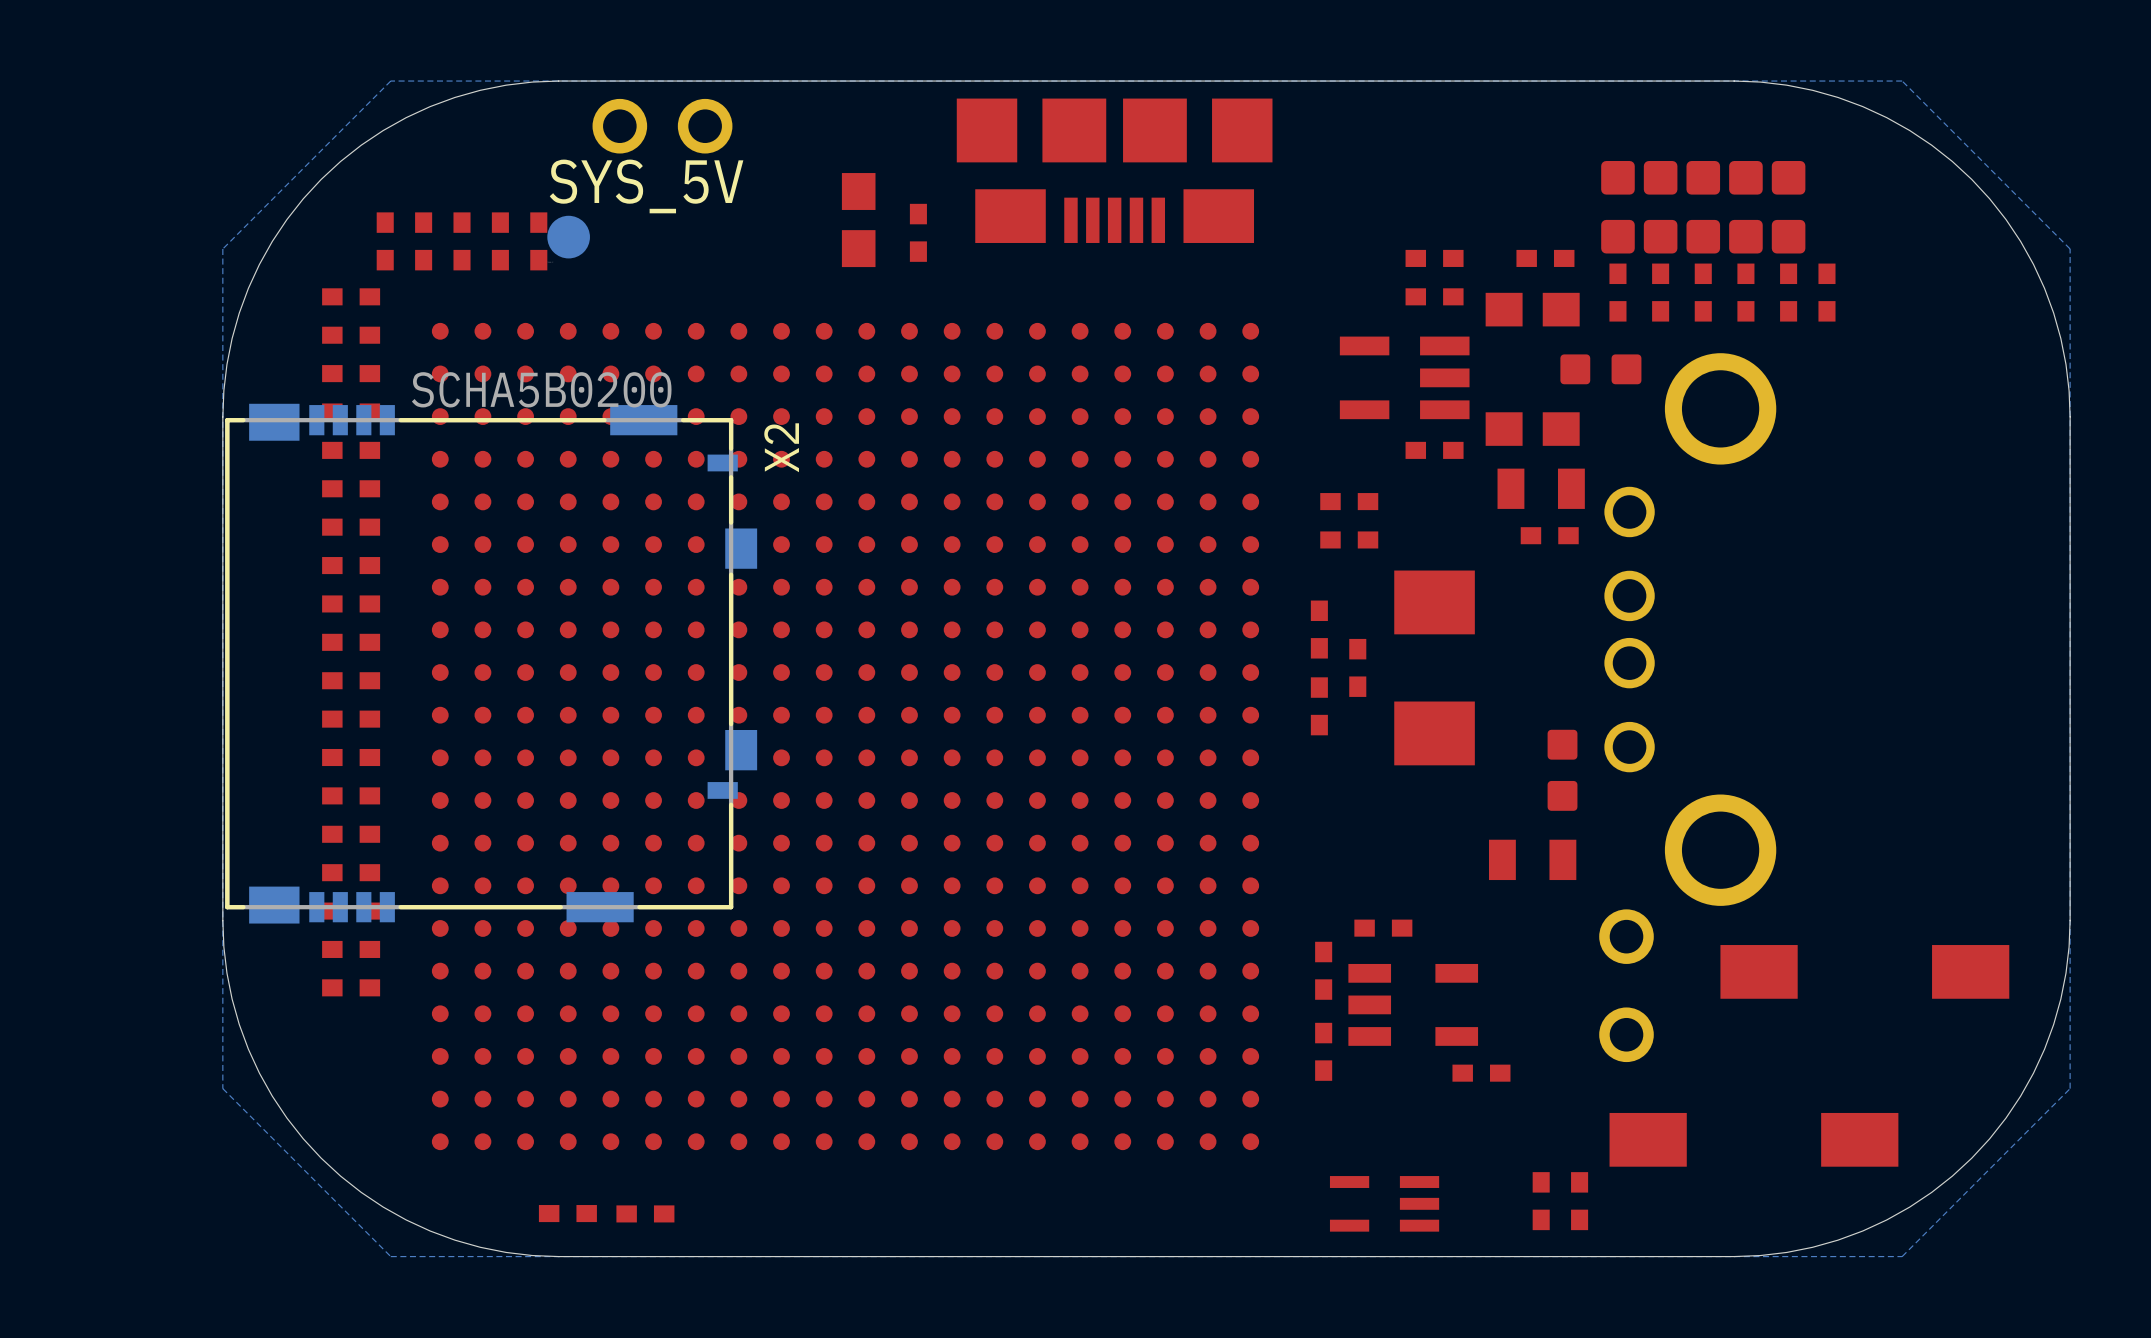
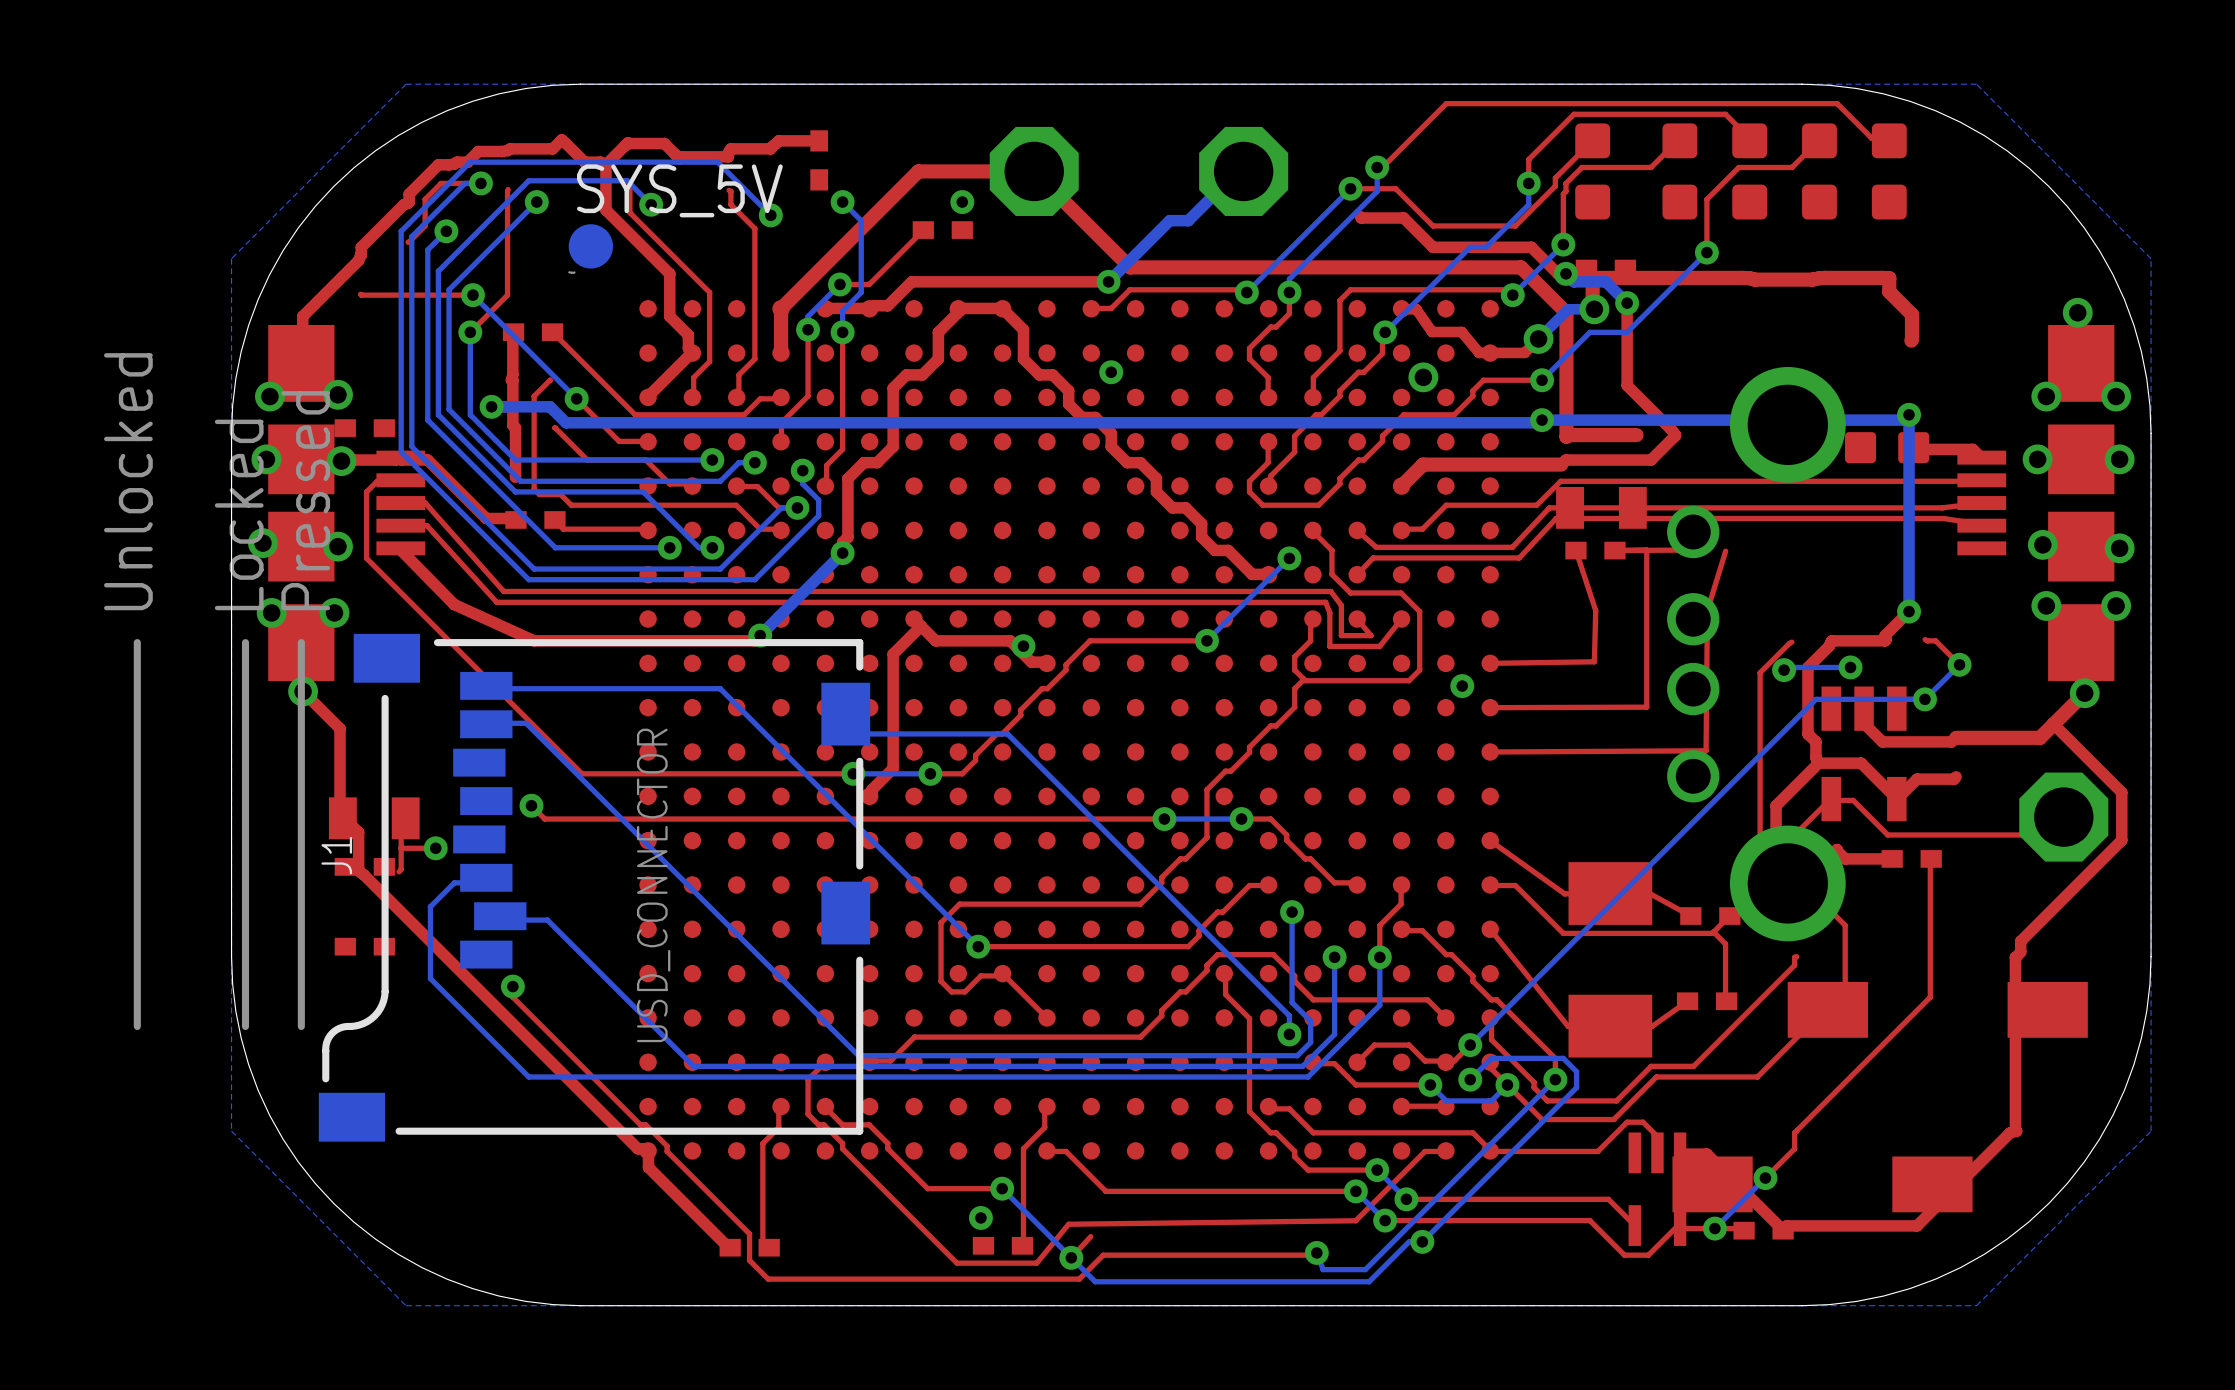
part: (619, 126) -> none
part: (705, 126) -> none
top track: none -> (818, 140) (778, 140) (770, 148) (730, 148) (728, 156) (680, 156) (679, 158) (664, 143) (627, 142) (605, 164)
top track: none -> (1592, 140) (1555, 178) (1555, 186) (1515, 225) (1433, 225) (1395, 188) (1350, 188)
top track: none -> (1679, 140) (1651, 167) (1581, 167) (1565, 183) (1565, 191) (1563, 194) (1563, 244)
top track: none -> (1749, 140) (1749, 138) (1725, 114) (1573, 114) (1528, 159) (1528, 183)
top track: none -> (1819, 140) (1792, 167) (1738, 167) (1706, 199) (1706, 252)
top track: none -> (1889, 140) (1887, 138) (1871, 138) (1837, 103) (1446, 103) (1382, 167) (1377, 167)
part: none -> (819, 160)
top track: none -> (605, 164) (605, 210) (669, 273) (669, 316) (688, 335) (688, 348) (692, 353) (648, 397)
top track: none -> (605, 164) (600, 162) (584, 162) (561, 139) (552, 148) (510, 148) (502, 151) (478, 151) (467, 162) (438, 164) (409, 194) (408, 203) (403, 204) (361, 247) (361, 255)
bottom track: none -> (1377, 167) (1377, 191) (1289, 279) (1289, 292)
via: none -> (1377, 167)
part: none -> (1034, 171)
bottom track: none -> (1243, 171) (1236, 172) (1188, 220) (1169, 220) (1108, 281)
part: none -> (1243, 171)
part: none -> (1592, 171)
part: none -> (1679, 171)
part: none -> (1749, 171)
part: none -> (1819, 171)
part: none -> (1889, 171)
part: (1114, 170) -> none
top track: none -> (627, 181) (629, 183) (629, 212) (709, 292) (709, 361) (693, 377) (692, 397)
top track: none -> (480, 183) (441, 183) (425, 199) (425, 225) (408, 242)
bottom track: none -> (480, 183) (465, 183) (411, 236) (411, 446) (534, 569) (720, 569) (781, 507) (797, 507)
via: none -> (480, 183)
bottom track: none -> (1528, 183) (1528, 204) (1486, 247) (1470, 247) (1385, 332)
via: none -> (1528, 183)
bottom track: none -> (1350, 188) (1246, 292)
via: none -> (1350, 188)
top track: none -> (508, 189) (507, 295) (470, 332)
top track: none -> (729, 190) (730, 191) (730, 204) (754, 228) (754, 358) (738, 374) (738, 396) (736, 397)
bottom track: none -> (536, 202) (449, 289) (449, 409) (520, 481) (720, 481) (738, 462) (754, 462)
via: none -> (536, 202)
bottom track: none -> (842, 202) (861, 220) (861, 292) (842, 311) (842, 332)
via: none -> (842, 202)
via: none -> (962, 202)
bottom track: none -> (651, 204) (627, 180) (528, 180) (438, 271) (438, 414) (515, 491) (643, 491) (699, 547) (712, 547)
via: none -> (651, 204)
bottom track: none -> (770, 215) (717, 162) (470, 162) (401, 231) (401, 452) (528, 579) (754, 579) (818, 515) (818, 499) (802, 483) (802, 470)
via: none -> (770, 215)
part: (1617, 207) -> none
part: (1660, 207) -> none
part: (1703, 207) -> none
part: (1745, 207) -> none
part: (1788, 207) -> none
top track: none -> (1360, 216) (1403, 218) (1433, 247) (1531, 247) (1558, 273) (1565, 273)
part: (858, 220) -> none
top track: none -> (923, 230) (869, 284) (839, 284)
bottom track: none -> (446, 231) (427, 249) (427, 420) (555, 547) (669, 547)
via: none -> (446, 231)
part rotation: 0° (918, 232) -> 90° clockwise (942, 230)
bottom track: none -> (1563, 244) (1512, 295)
via: none -> (1563, 244)
part: (385, 241) -> none
part: (423, 241) -> none
part: (462, 241) -> none
part: (500, 241) -> none
part: (538, 241) -> none
bottom track: none -> (1706, 252) (1627, 332) (1589, 332) (1542, 380)
via: none -> (1706, 252)
top track: none -> (360, 255) (358, 260) (302, 316) (301, 363) (268, 396) (269, 396)
part: (1434, 258) -> none
bottom track: none -> (1565, 273) (1573, 281) (1605, 281) (1627, 303)
via: none -> (1565, 273)
top track: none -> (1679, 278) (1592, 277) (1592, 305) (1594, 309) (1592, 307)
top track: none -> (1749, 278) (1679, 278)
top track: none -> (1819, 278) (1889, 278) (1889, 291) (1911, 314) (1911, 340)
top track: none -> (1819, 278) (1749, 278)
top track: none -> (1108, 281) (911, 281) (887, 305) (874, 305) (869, 308)
via: none -> (1108, 281)
bottom track: none -> (839, 284) (808, 316) (808, 329)
via: none -> (839, 284)
top track: none -> (1246, 292) (1244, 289) (1129, 289) (1111, 308) (1091, 308)
via: none -> (1246, 292)
top track: none -> (1289, 292) (1289, 313) (1276, 327) (1270, 327) (1249, 348) (1249, 358) (1268, 377) (1268, 397)
via: none -> (1289, 292)
top track: none -> (360, 294) (472, 295)
bottom track: none -> (472, 295) (576, 398)
via: none -> (472, 295)
top track: none -> (1512, 295) (1507, 289) (1350, 289) (1339, 300) (1339, 350) (1313, 377) (1312, 397)
via: none -> (1512, 295)
top track: none -> (1627, 303) (1627, 385) (1675, 435) (1651, 460) (1565, 460) (1561, 464) (1423, 464) (1401, 486)
via: none -> (1627, 303)
part: (1617, 292) -> none
part: (1660, 292) -> none
part: (1703, 292) -> none
part: (1745, 292) -> none
part: (1788, 292) -> none
part: (1826, 292) -> none
part: (351, 296) -> none
top track: none -> (869, 308) (825, 308)
part: (1434, 296) -> none
top track: none -> (1401, 308) (1416, 309) (1432, 331) (1461, 331) (1479, 352) (1489, 352)
bottom track: none -> (1594, 309) (1568, 309) (1538, 338)
via: none -> (1594, 309)
via: none -> (2077, 312)
part: (1532, 309) -> none
top track: none -> (808, 329) (808, 396) (781, 422) (781, 441)
via: none -> (808, 329)
bottom track: none -> (470, 332) (470, 414) (515, 460) (712, 460)
via: none -> (470, 332)
top track: none -> (513, 332) (511, 380) (512, 425) (515, 427) (515, 477)
part: none -> (533, 332)
top track: none -> (552, 332) (635, 414) (744, 414) (760, 398) (781, 397)
top track: none -> (842, 332) (842, 449) (826, 465) (825, 486)
via: none -> (842, 332)
top track: none -> (1385, 332) (1382, 335) (1382, 353) (1363, 372) (1358, 372) (1339, 390) (1339, 396) (1321, 414) (1316, 414) (1294, 436) (1294, 452) (1270, 475) (1270, 483) (1268, 486)
via: none -> (1385, 332)
top track: none -> (1538, 338) (1524, 352) (1490, 353)
via: none -> (1538, 338)
part: (351, 335) -> none
top track: none -> (781, 353) (781, 308) (918, 171) (1034, 171) (1130, 267) (1521, 267) (1566, 312) (1566, 436) (1568, 435) (1636, 435)
via: none -> (1111, 372)
via: none -> (1423, 377)
top track: none -> (550, 380) (534, 396) (534, 489) (539, 494) (560, 494) (571, 505) (736, 505) (760, 529) (781, 530)
top track: none -> (1542, 380) (1483, 380) (1472, 390) (1472, 396) (1454, 414) (1403, 414) (1382, 436) (1382, 441) (1363, 460) (1358, 460) (1339, 478) (1339, 483) (1318, 505) (1262, 505) (1249, 491) (1249, 481) (1268, 462) (1268, 441)
via: none -> (1542, 380)
part: (1600, 369) -> none
part: (351, 373) -> none
part: (1404, 377) -> none
via: none -> (337, 394)
via: none -> (269, 396)
via: none -> (2046, 396)
via: none -> (2116, 396)
top track: none -> (576, 398) (619, 441) (648, 441)
via: none -> (576, 398)
bottom track: none -> (491, 406) (550, 406) (566, 422) (1536, 422) (1542, 420) (1903, 420) (1909, 414) (1909, 611)
via: none -> (491, 406)
via: none -> (1909, 414)
via: none -> (1542, 420)
top track: none -> (554, 427) (587, 460) (645, 460) (669, 483) (691, 483) (692, 486)
part: (1532, 429) -> none
part: none -> (1887, 447)
top track: none -> (1913, 447) (1914, 449) (1972, 449) (1981, 457)
via: none -> (266, 459)
via: none -> (712, 460)
via: none -> (2037, 459)
via: none -> (2119, 459)
top track: none -> (341, 461) (395, 460) (400, 457) (401, 460) (427, 460) (486, 518) (515, 519)
via: none -> (341, 461)
via: none -> (754, 462)
part: (351, 450) -> none
part: (1434, 450) -> none
via: none -> (802, 470)
top track: none -> (400, 480) (377, 481) (366, 491) (366, 558) (582, 773) (853, 773)
top track: none -> (1981, 480) (1560, 481) (1536, 505) (1446, 505) (1422, 529) (1401, 530)
top track: none -> (736, 486) (757, 486) (778, 507) (797, 507)
part footprint: [322, 480, 381, 498] -> [268, 325, 426, 681]
top track: none -> (400, 503) (425, 503) (503, 591) (1330, 591) (1341, 605) (1341, 635) (1371, 635) (1357, 619)
top track: none -> (1981, 503) (1942, 507) (1549, 507) (1512, 547) (1376, 547) (1357, 530)
part: none -> (2035, 503)
via: none -> (797, 507)
part: none -> (535, 519)
top track: none -> (554, 519) (563, 529) (648, 530)
part: (1349, 501) -> none
top track: none -> (1978, 523) (1943, 518) (1556, 518) (1519, 557) (1373, 557) (1357, 574)
top track: none -> (400, 525) (426, 525) (496, 602) (1325, 602) (1329, 612) (1329, 646) (1379, 646) (1401, 619)
top track: none -> (1312, 530) (1331, 550) (1331, 574) (1350, 592) (1401, 592) (1419, 611) (1419, 670) (1409, 680) (1305, 680) (1294, 670) (1294, 656) (1310, 640) (1310, 619) (1312, 619)
via: none -> (262, 543)
via: none -> (2042, 544)
via: none -> (337, 546)
part: (351, 527) -> none
top track: none -> (400, 548) (454, 604) (534, 640) (754, 640) (760, 635)
via: none -> (669, 547)
via: none -> (712, 547)
via: none -> (2119, 548)
top track: none -> (1575, 550) (1595, 610) (1594, 661) (1490, 663)
top track: none -> (1686, 551) (1678, 550) (1614, 550) (1646, 550) (1646, 707) (1490, 707)
top track: none -> (1725, 551) (1707, 610) (1706, 750) (1490, 752)
top track: none -> (842, 553) (842, 542) (847, 537) (847, 478) (863, 462) (877, 462) (893, 446) (893, 388) (906, 374) (922, 374) (938, 358) (938, 332) (956, 313) (958, 308) (999, 308) (1002, 308) (1023, 329) (1023, 358) (1039, 374) (1052, 374) (1068, 390) (1068, 404) (1081, 417) (1095, 417) (1111, 433) (1111, 446) (1127, 462) (1140, 462) (1156, 478) (1156, 491) (1172, 507) (1185, 507) (1201, 523) (1201, 537) (1214, 550) (1228, 550) (1252, 574) (1268, 574)
bottom track: none -> (842, 553) (760, 635)
via: none -> (842, 553)
part position: (1549, 535) -> (1595, 550)
bottom track: none -> (1289, 558) (1206, 640)
via: none -> (1289, 558)
part: (1349, 539) -> none
part: (351, 565) -> none
via: none -> (2046, 605)
via: none -> (2116, 605)
top track: none -> (1909, 611) (1885, 635) (1885, 640) (1831, 640) (1829, 646) (1807, 667) (1807, 733) (1815, 741) (1815, 757) (1818, 763)
via: none -> (1909, 611)
via: none -> (271, 612)
via: none -> (334, 612)
top track: none -> (914, 619) (935, 640) (1010, 640) (1031, 662) (1046, 663)
top track: none -> (921, 626) (893, 654) (893, 768) (871, 789) (871, 795) (869, 796)
part: (351, 603) -> none
via: none -> (760, 635)
top track: none -> (1925, 639) (1935, 640) (1959, 664)
top track: none -> (1206, 640) (1089, 640) (1066, 664) (1066, 670) (1047, 688) (1042, 688) (1020, 710) (1020, 715) (1002, 733) (996, 733) (975, 755) (975, 760) (962, 773) (930, 773)
via: none -> (1206, 640)
top track: none -> (1791, 642) (1760, 672) (1760, 869) (1776, 885) (1805, 885) (1845, 925) (1845, 989) (1757, 1076) (1656, 1076) (1613, 1119) (1542, 1119) (1491, 1069) (1490, 1062)
top track: none -> (2081, 642) (2081, 677) (2084, 693) (2040, 737) (1956, 737) (1951, 741) (1882, 741) (1866, 725) (1866, 710) (1864, 708)
via: none -> (1023, 646)
part: (1319, 629) -> none
bottom track: none -> (1959, 664) (1924, 699) (1815, 699) (1470, 1045)
via: none -> (1959, 664)
part: (351, 642) -> none
bottom track: none -> (1850, 667) (1786, 667) (1784, 670)
via: none -> (1850, 667)
via: none -> (1784, 670)
top track: none -> (1304, 679) (1294, 688) (1294, 707) (1276, 725) (1270, 725) (1249, 747) (1249, 752) (1230, 771) (1225, 771) (1206, 789) (1206, 837) (1185, 858) (1180, 858) (1161, 877) (1161, 882) (1140, 904) (959, 904) (941, 922) (941, 981) (951, 991) (964, 991) (980, 975) (1002, 975) (1002, 973) (1046, 1017)
bottom track: none -> (486, 685) (491, 688) (720, 688) (978, 946)
via: none -> (1462, 686)
X2: SCHA5B0200 (491, 663) -> none
top track: none -> (303, 691) (340, 728) (340, 813) (358, 832) (360, 871) (637, 1148) (648, 1150)
via: none -> (303, 691)
part: (1357, 667) -> none
part: (1434, 667) -> none
via: none -> (2084, 693)
via: none -> (1924, 699)
part: (351, 680) -> none
bottom track: none -> (845, 714) (866, 733) (1007, 733) (1289, 1015) (1289, 1034)
bottom track: none -> (486, 724) (526, 723) (858, 1055) (1297, 1055) (1310, 1042) (1310, 1021) (1292, 1002) (1292, 912)
top track: none -> (2053, 724) (2121, 792) (2121, 840) (2020, 941) (2020, 952) (2015, 957) (2016, 1131) (2010, 1132) (1917, 1225) (1786, 1225) (1783, 1230) (1706, 1154) (1680, 1152)
part: (1319, 706) -> none
part: (351, 719) -> none
top track: none -> (1818, 763) (1776, 805) (1776, 864) (1781, 869) (1815, 869) (1837, 849) (1845, 858) (1892, 858)
top track: none -> (1818, 763) (1861, 763) (1896, 799) (1917, 779) (1954, 779) (1956, 776)
part position: (845, 736) -> (1069, 729)
via: none -> (853, 773)
bottom track: none -> (930, 773) (853, 773)
via: none -> (930, 773)
part: (351, 757) -> none
part: (1562, 770) -> none
top track: none -> (531, 805) (544, 819) (1164, 819)
via: none -> (531, 805)
top track: none -> (2063, 817) (2047, 834) (1887, 834) (1853, 800) (1831, 799) (1800, 829) (1800, 848) (1798, 849)
part: none -> (2063, 817)
part footprint: [322, 787, 381, 805] -> [328, 797, 420, 840]
top track: none -> (405, 818) (401, 821) (401, 869) (399, 871)
via: none -> (1164, 819)
top track: none -> (1241, 819) (1270, 819) (1286, 834) (1286, 840) (1305, 858) (1310, 858) (1334, 882) (1355, 882) (1357, 884)
bottom track: none -> (1241, 819) (1164, 819)
via: none -> (1241, 819)
top track: none -> (1490, 840) (1564, 893) (1650, 893) (1690, 916)
top track: none -> (435, 848) (401, 848)
via: none -> (435, 848)
part: none -> (1911, 858)
top track: none -> (1931, 858) (1930, 997) (1794, 1132) (1794, 1148) (1765, 1178)
bottom track: none -> (486, 877) (483, 882) (454, 882) (430, 906) (430, 978) (528, 1076) (1308, 1076) (1379, 1005) (1379, 957)
top track: none -> (1268, 884) (1249, 885) (1222, 912) (1217, 912) (1198, 930) (1198, 936) (1188, 946) (978, 946)
top track: none -> (1401, 884) (1401, 904) (1379, 925) (1379, 957)
top track: none -> (1490, 884) (1515, 885) (1563, 933) (1712, 933) (1729, 916)
J1: none -> USD_CONNECTOR (501, 887)
part: (1532, 859) -> none
part: (351, 872) -> none
via: none -> (1292, 912)
bottom track: none -> (500, 916) (504, 920) (547, 920) (693, 1066) (1302, 1066) (1334, 1034) (1334, 957)
part: none -> (1710, 916)
top track: none -> (1401, 929) (1422, 930) (1446, 954) (1451, 954) (1472, 975) (1472, 981) (1491, 999) (1496, 999) (1555, 1058) (1555, 1079)
top track: none -> (1490, 929) (1568, 1026) (1651, 1026) (1687, 1001)
top track: none -> (1713, 932) (1725, 944) (1726, 1001)
via: none -> (978, 946)
top track: none -> (1796, 956) (1794, 957) (1794, 965) (1693, 1066) (1651, 1066) (1616, 1100) (1547, 1100) (1534, 1087) (1534, 1082) (1491, 1039) (1490, 1017)
via: none -> (1334, 957)
via: none -> (1379, 957)
part: none -> (1610, 959)
part: (1383, 928) -> none
top track: none -> (1224, 973) (1225, 994) (1249, 1018) (1249, 1111) (1270, 1132) (1276, 1132) (1294, 1151) (1294, 1156) (1308, 1170) (1377, 1170)
part: (1626, 936) -> none
part: (351, 949) -> none
top track: none -> (512, 986) (512, 997) (640, 1124) (645, 1124) (667, 1146) (667, 1151) (749, 1233) (749, 1260) (768, 1279) (1079, 1279) (1103, 1255) (1316, 1255) (1316, 1252)
via: none -> (512, 986)
part: none -> (1707, 1001)
part: (1323, 970) -> none
top track: none -> (1445, 1017) (1427, 999) (1313, 999) (1294, 981) (1294, 975) (1273, 954) (1217, 954) (1206, 965) (1206, 970) (1185, 991) (1180, 991) (1161, 1010) (1161, 1015) (1140, 1037) (914, 1037) (890, 1061) (869, 1062)
part: (351, 987) -> none
via: none -> (1289, 1034)
part rotation: 0° (1413, 1004) -> 90° clockwise (1864, 753)
part position: (1413, 1004) -> (1864, 753)
top track: none -> (1470, 1045) (1454, 1061) (1445, 1062) (1425, 1061) (1409, 1045) (1374, 1045) (1357, 1062)
via: none -> (1470, 1045)
top track: none -> (825, 1062) (808, 1079) (808, 1114) (818, 1124) (824, 1124) (842, 1143) (842, 1148) (956, 1263) (1036, 1263) (1068, 1224) (1355, 1220) (1425, 1151) (1445, 1150)
top track: none -> (1312, 1062) (1334, 1063) (1355, 1084) (1430, 1084)
part: (1626, 1034) -> none
bottom track: none -> (1470, 1079) (1491, 1058) (1563, 1058) (1576, 1071) (1576, 1087) (1422, 1241) (1409, 1241) (1369, 1281) (1095, 1281) (1002, 1188)
via: none -> (1470, 1079)
bottom track: none -> (1555, 1079) (1365, 1269) (1323, 1269) (1316, 1252)
via: none -> (1555, 1079)
via: none -> (1430, 1084)
bottom track: none -> (1507, 1084) (1491, 1100) (1446, 1100) (1430, 1084)
via: none -> (1507, 1084)
part: (1323, 1051) -> none
top track: none -> (781, 1106) (778, 1108) (778, 1127) (762, 1143) (762, 1241) (769, 1247)
top track: none -> (825, 1106) (842, 1124) (869, 1124) (887, 1143) (887, 1148) (927, 1188) (1002, 1188)
top track: none -> (1046, 1106) (1044, 1108) (1044, 1127) (1023, 1148) (1022, 1245)
top track: none -> (1268, 1106) (1270, 1108) (1289, 1108) (1313, 1132) (1472, 1132) (1491, 1151) (1597, 1151) (1627, 1122) (1643, 1122) (1656, 1135) (1657, 1152)
top track: none -> (1445, 1106) (1401, 1106)
part: (1481, 1073) -> none
top track: none -> (648, 1151) (648, 1167) (730, 1247)
top track: none -> (1047, 1151) (1066, 1151) (1105, 1191) (1355, 1191)
bottom track: none -> (1377, 1170) (1406, 1199)
via: none -> (1377, 1170)
bottom track: none -> (1765, 1178) (1714, 1228)
via: none -> (1765, 1178)
via: none -> (1002, 1188)
bottom track: none -> (1355, 1191) (1385, 1220)
via: none -> (1355, 1191)
top track: none -> (1406, 1199) (1608, 1199) (1634, 1225)
via: none -> (1406, 1199)
via: none -> (980, 1217)
top track: none -> (1385, 1220) (1589, 1220) (1624, 1255) (1648, 1255) (1677, 1225) (1680, 1225) (1677, 1228) (1741, 1228) (1744, 1230)
via: none -> (1385, 1220)
via: none -> (1714, 1228)
part: none -> (1763, 1230)
top track: none -> (1090, 1236) (1071, 1257)
via: none -> (1422, 1241)
part: none -> (1002, 1245)
part: none -> (749, 1247)
part: (1541, 1201) -> none
part: (1579, 1201) -> none
part rotation: 0° (1384, 1203) -> 90° counterclockwise (1657, 1189)
part position: (1384, 1203) -> (1657, 1189)
via: none -> (1316, 1252)
via: none -> (1071, 1257)
part: (567, 1213) -> none
part: (645, 1213) -> none

